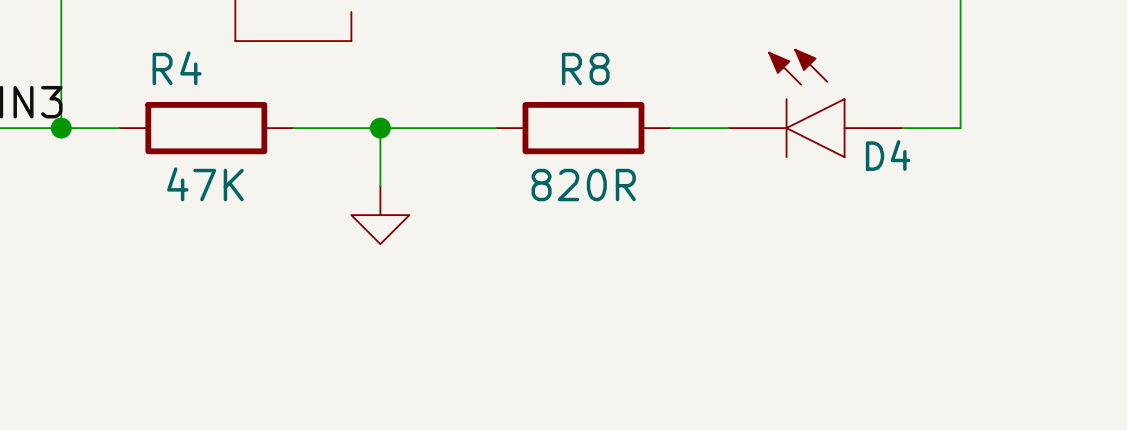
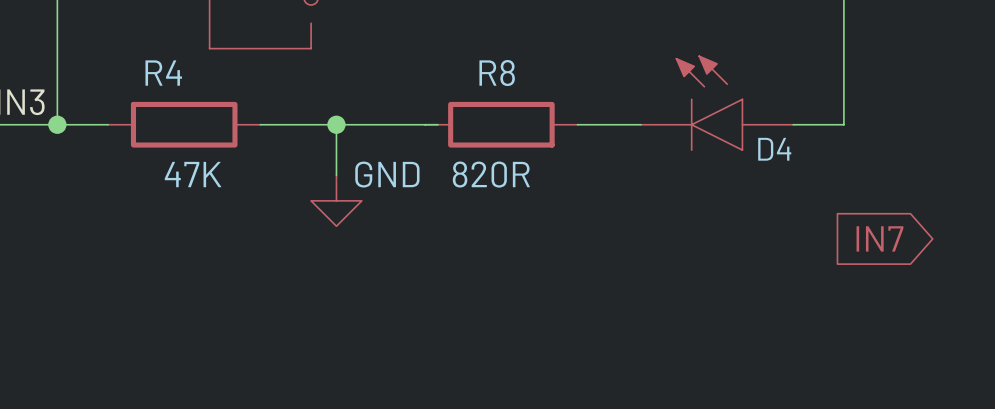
R8 position: (583, 128) -> (501, 124)
power symbol text: none -> GND (387, 174)
global label: none -> IN7 (879, 238)

